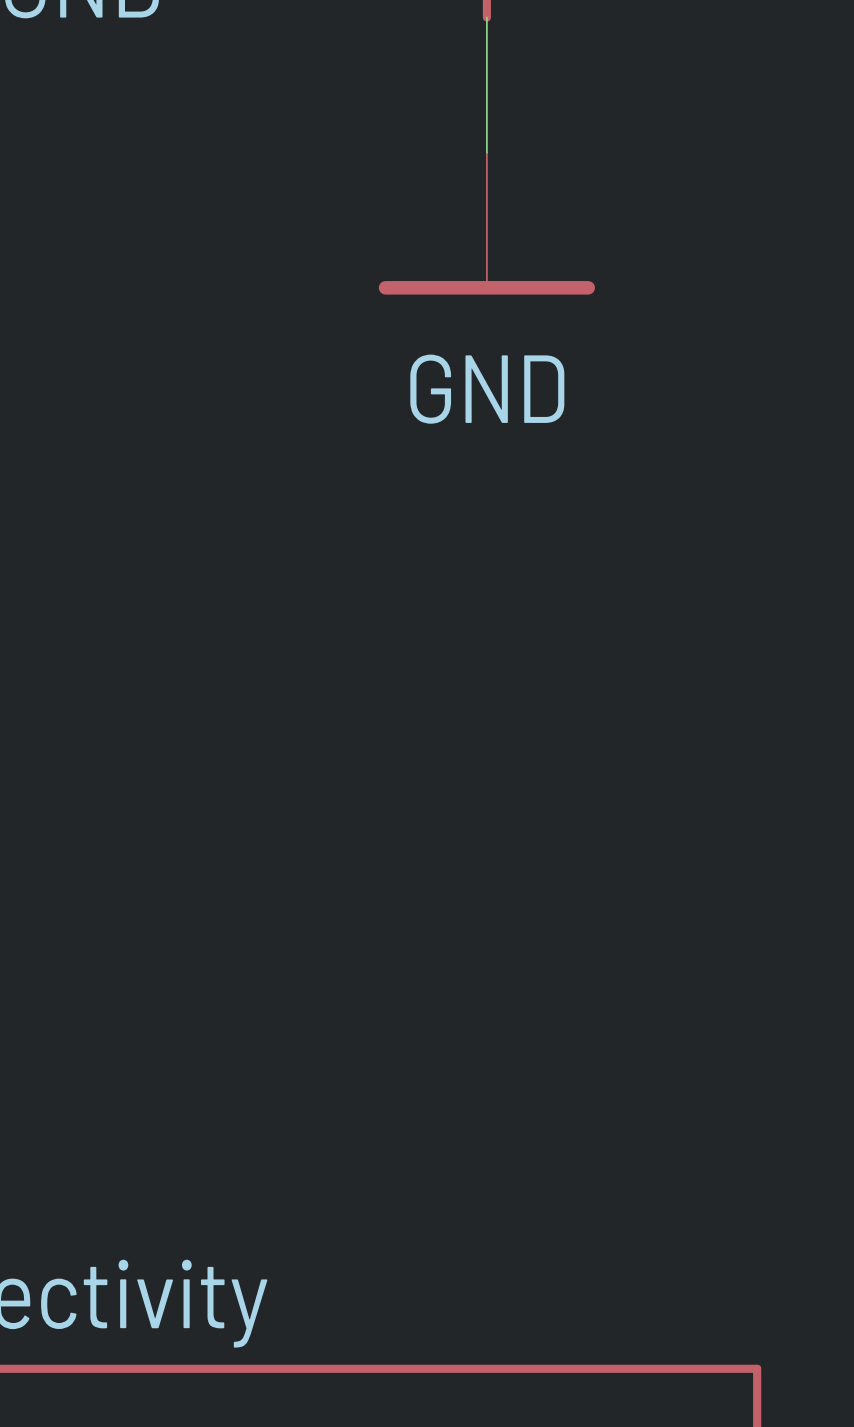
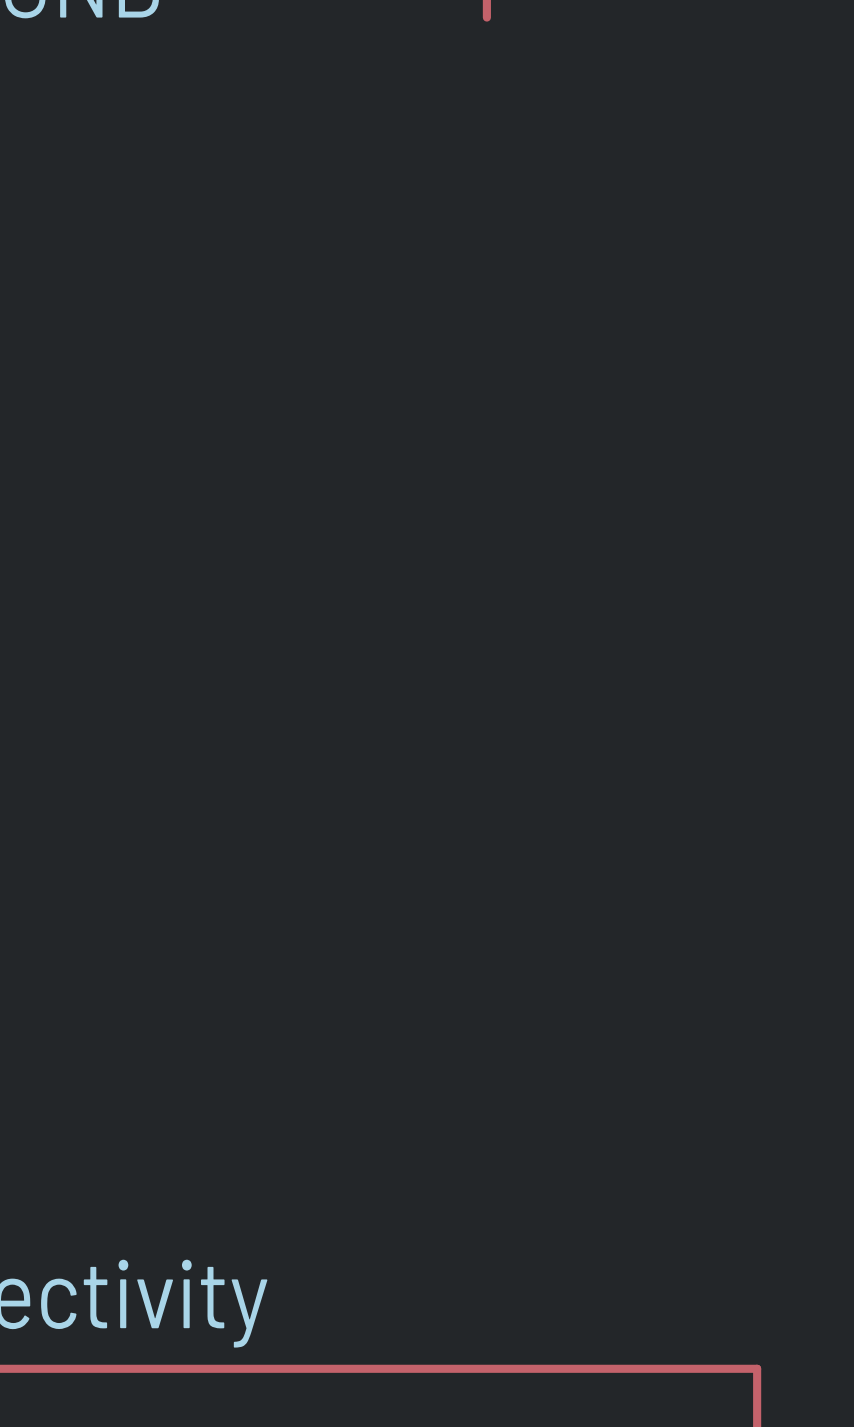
wire: (486, 17) (486, 152) -> none
power symbol: GND (486, 223) -> none

